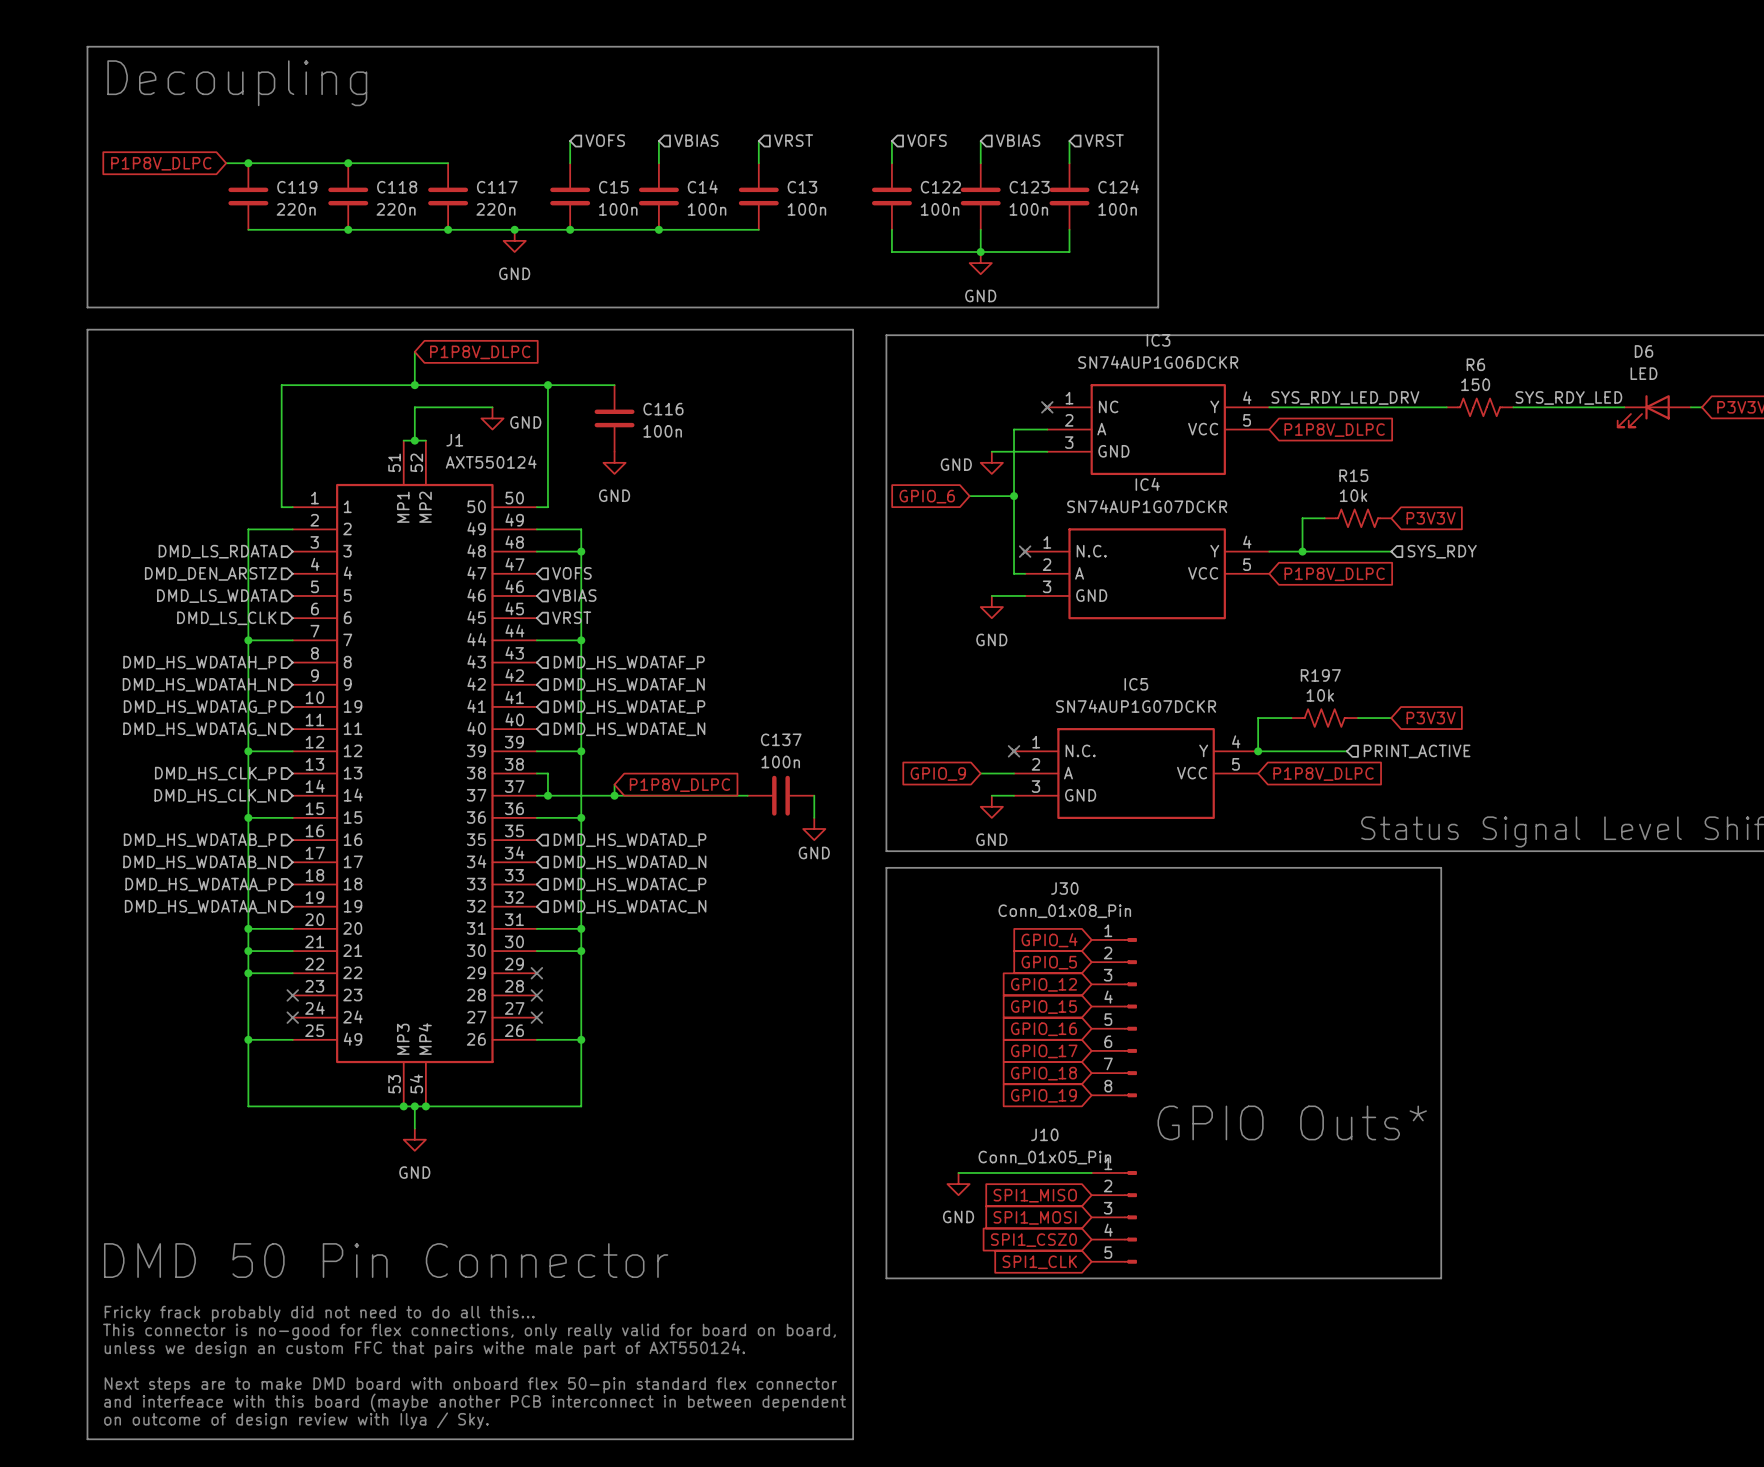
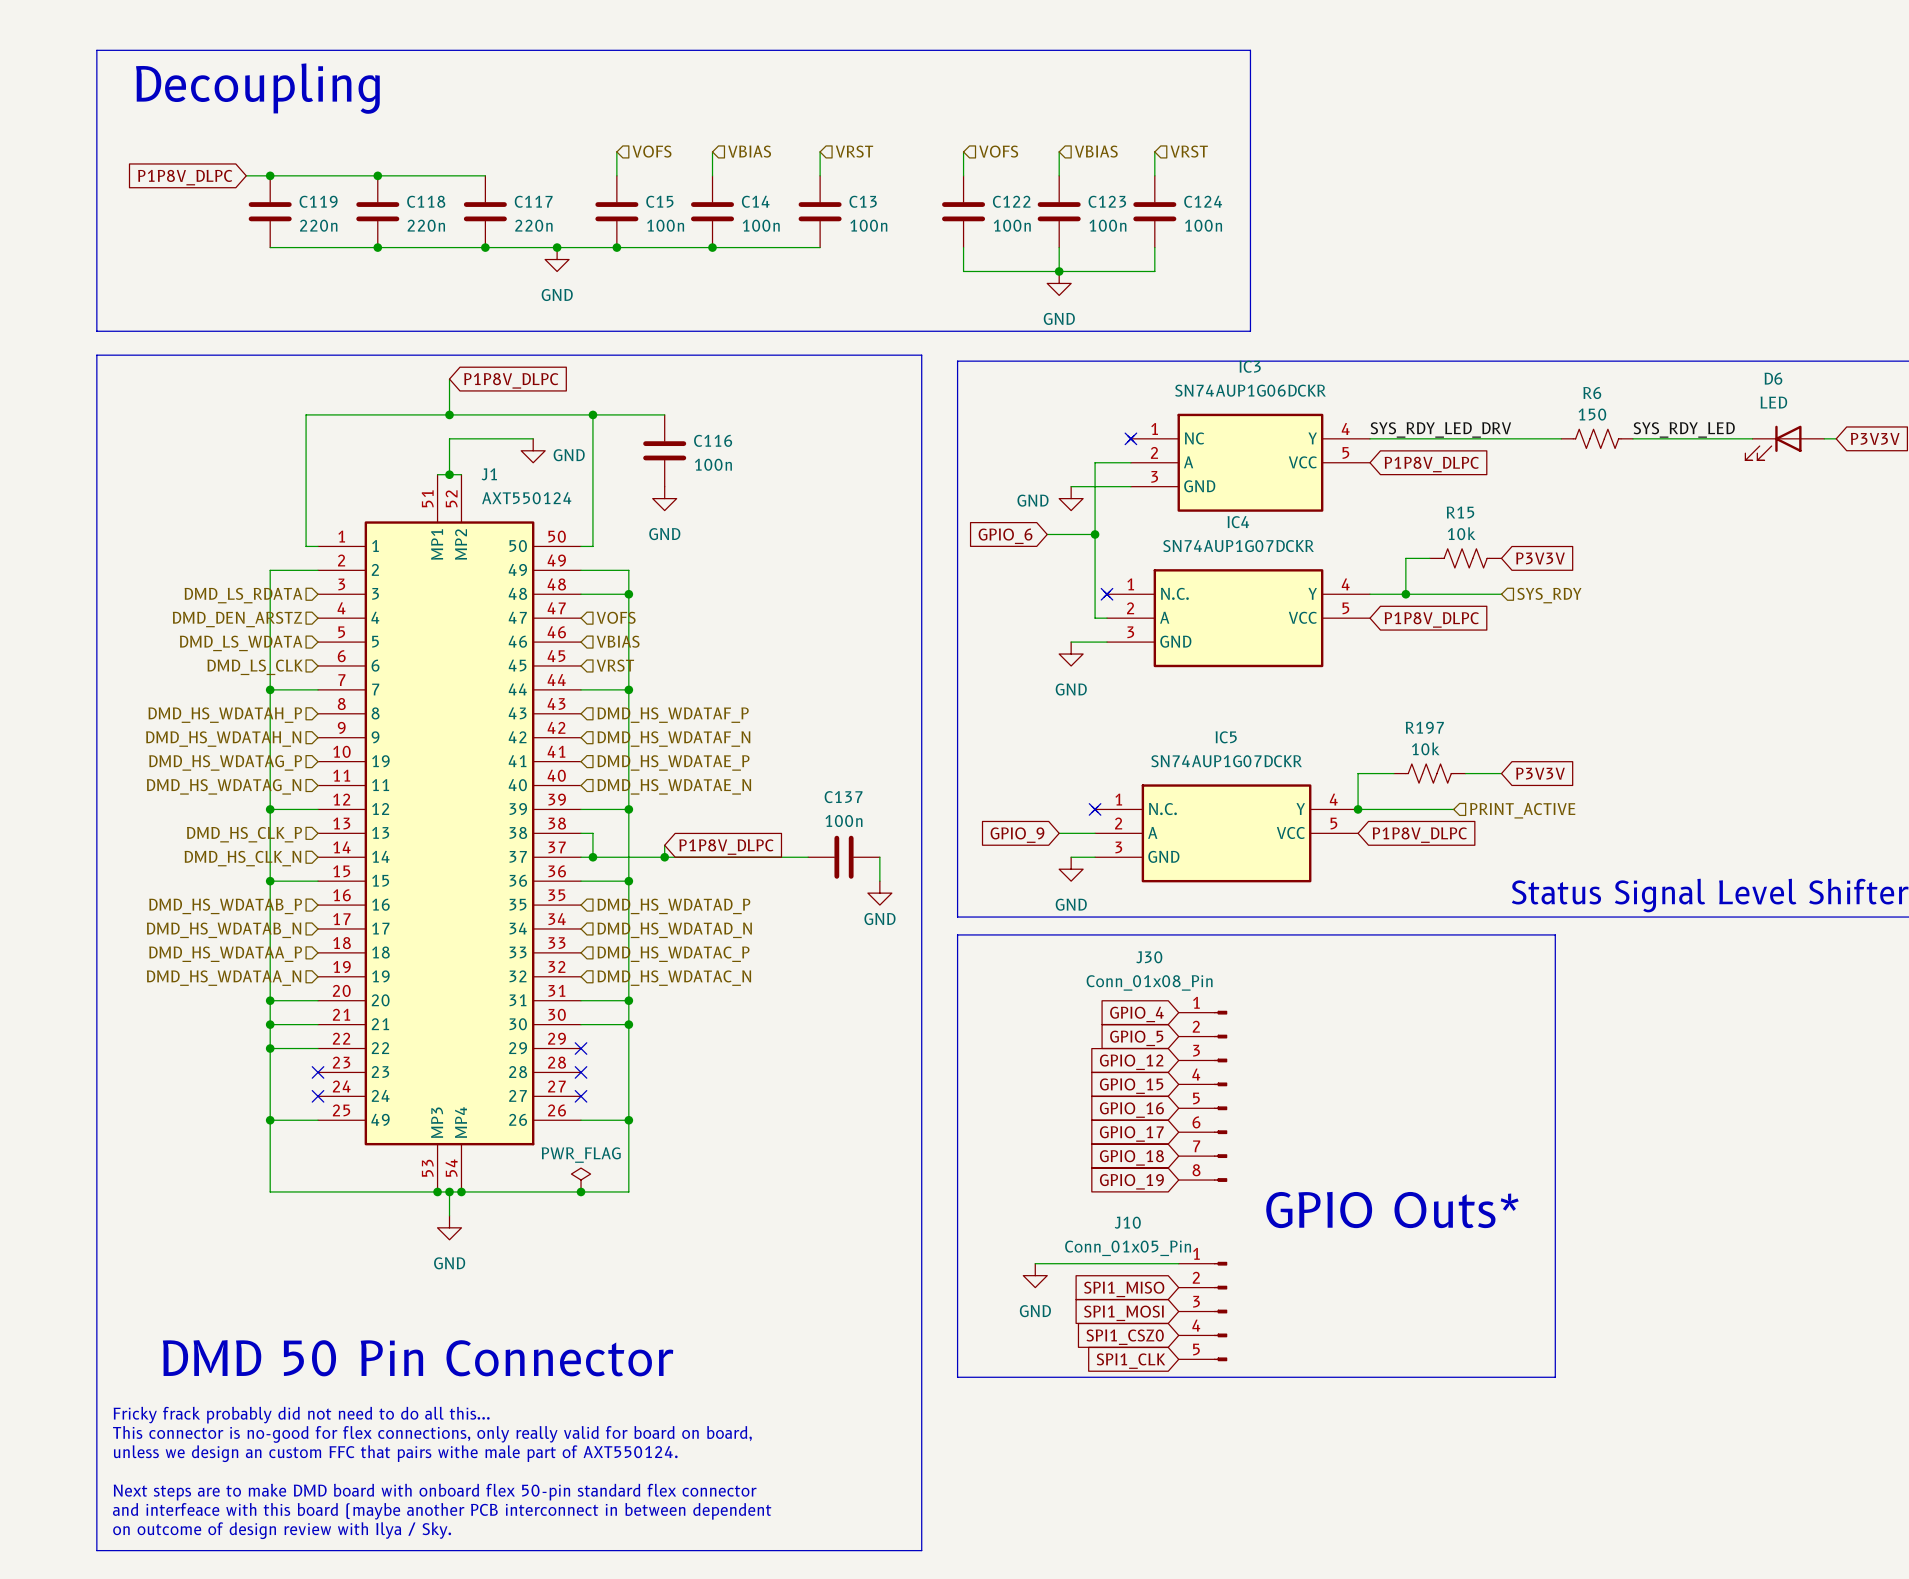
power symbol: none -> PWR_FLAG (581, 1180)
junction: none -> (581, 1191)

